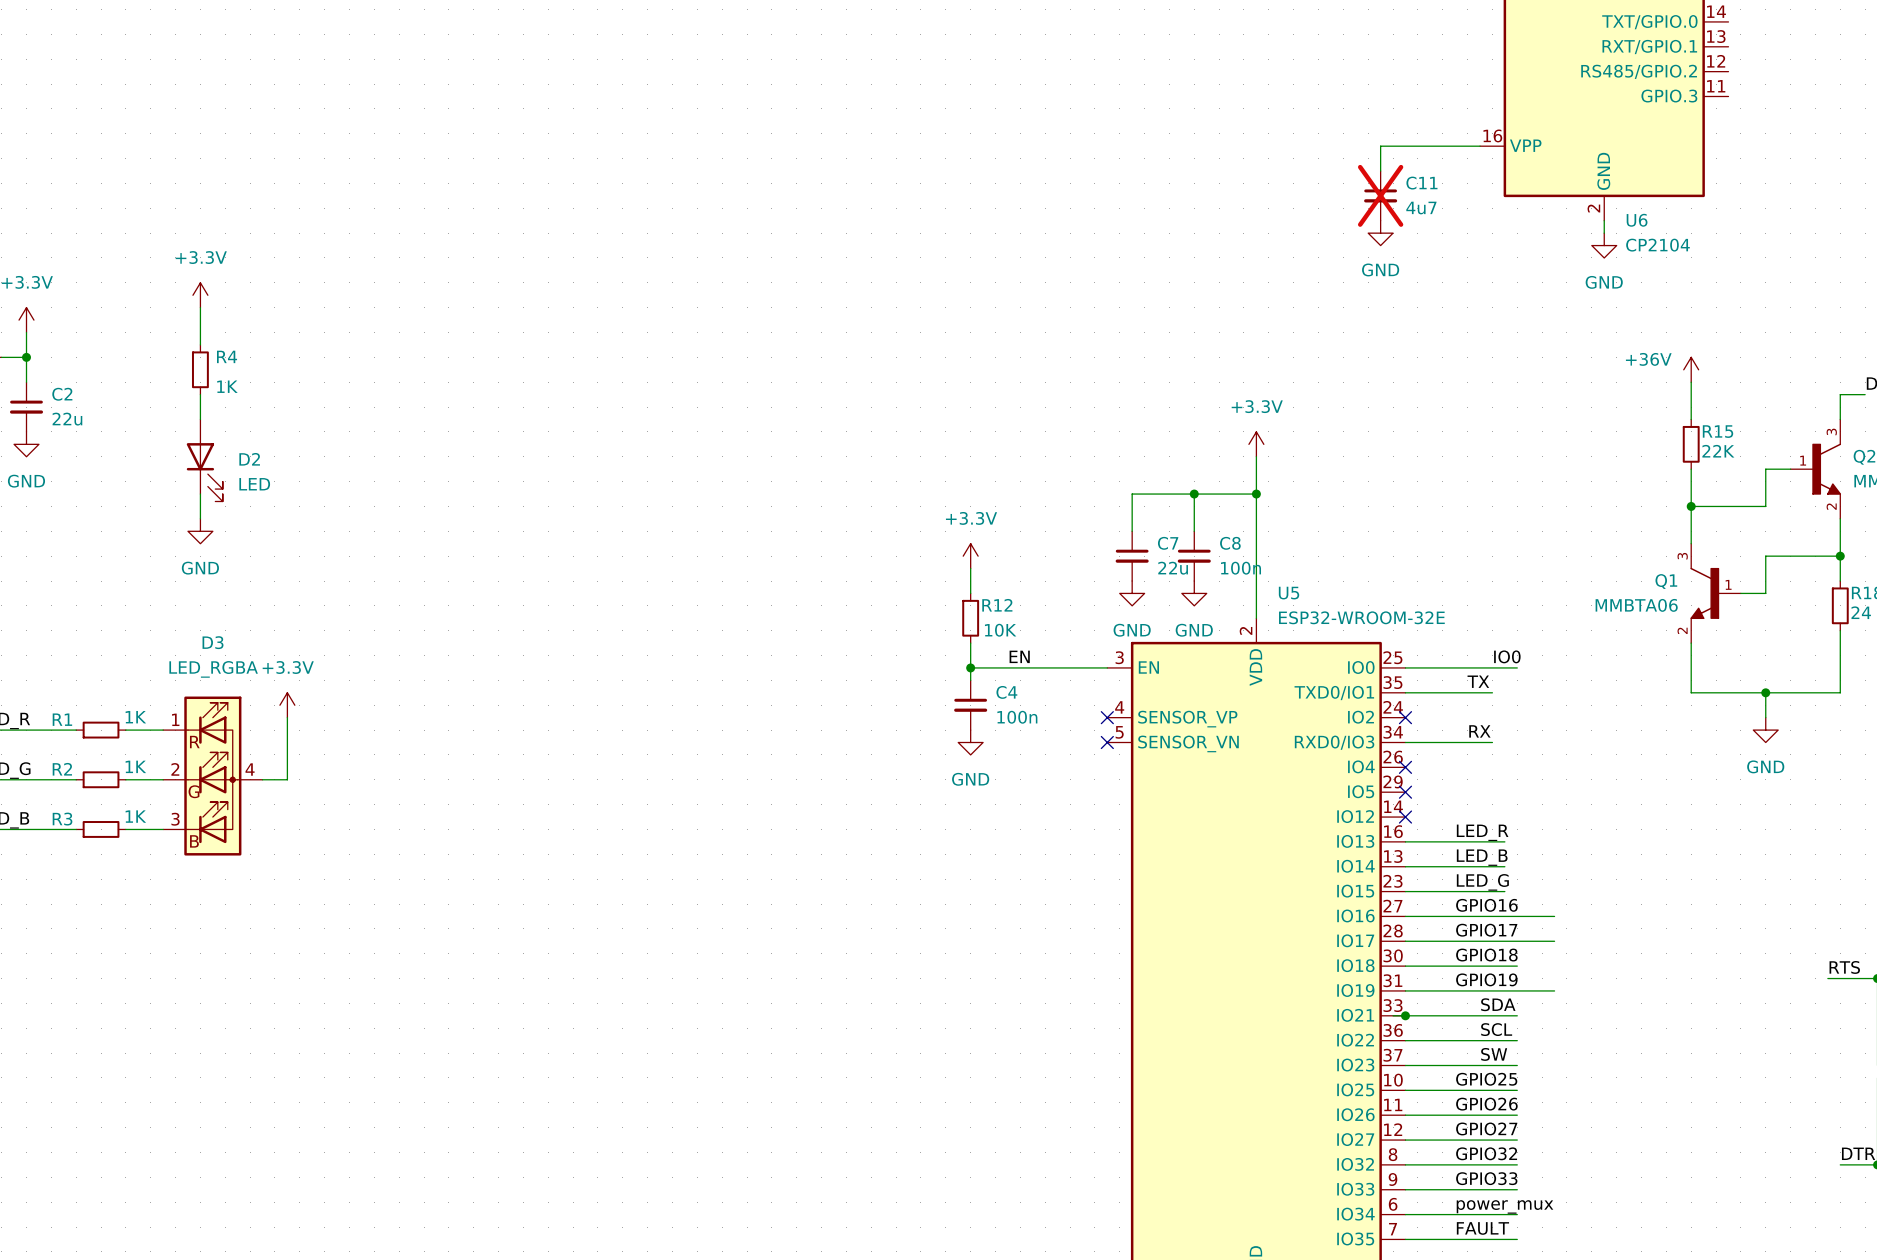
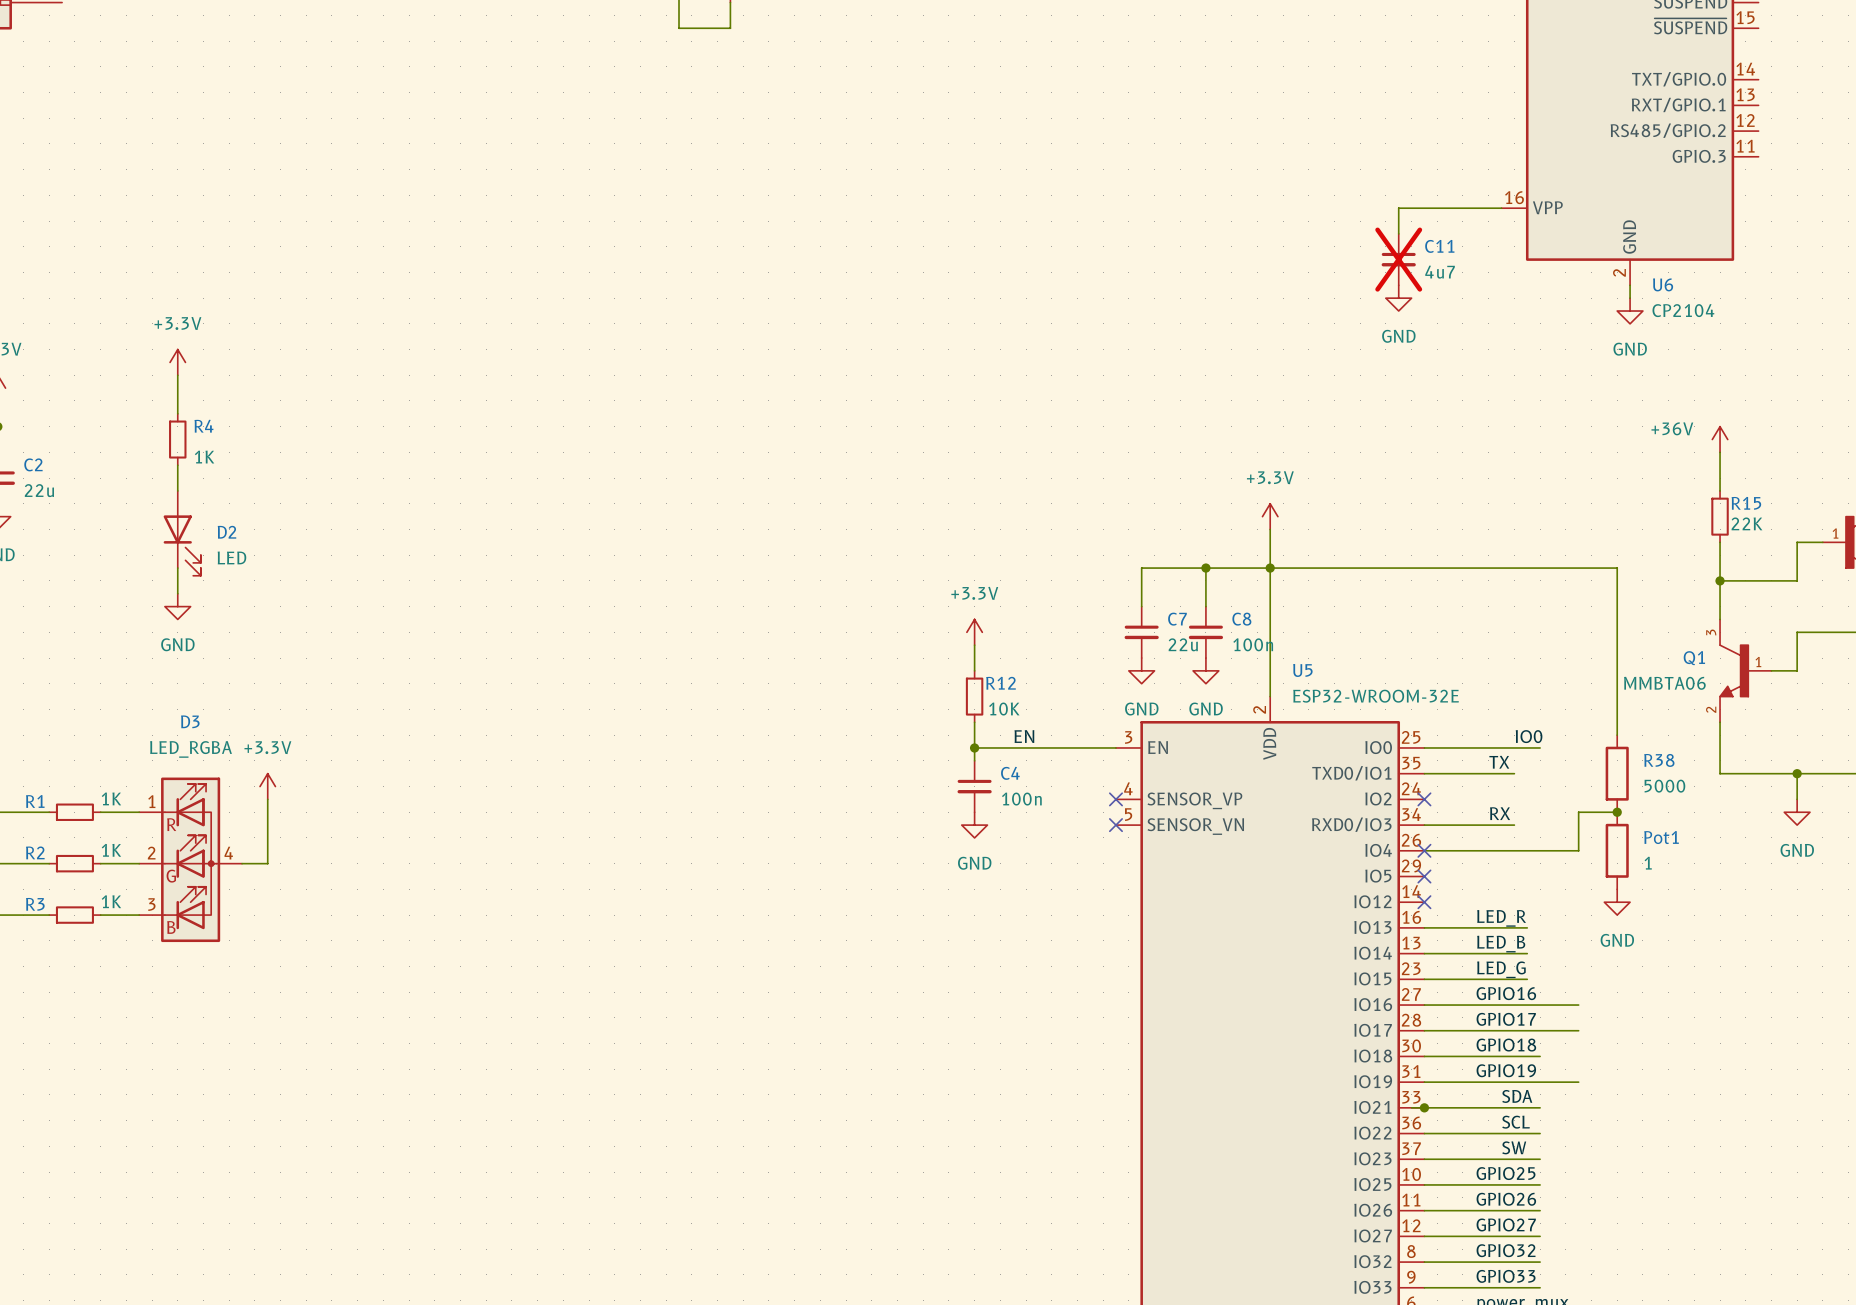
wire: none -> (1270, 568) (1617, 568) (1617, 735)
R38: none -> 5000 (1617, 773)
wire: none -> (1617, 812) (1578, 812) (1578, 850) (1424, 850)
junction: none -> (1617, 812)
Pot1: none -> 1 (1617, 850)
power symbol: none -> GND (1617, 902)

